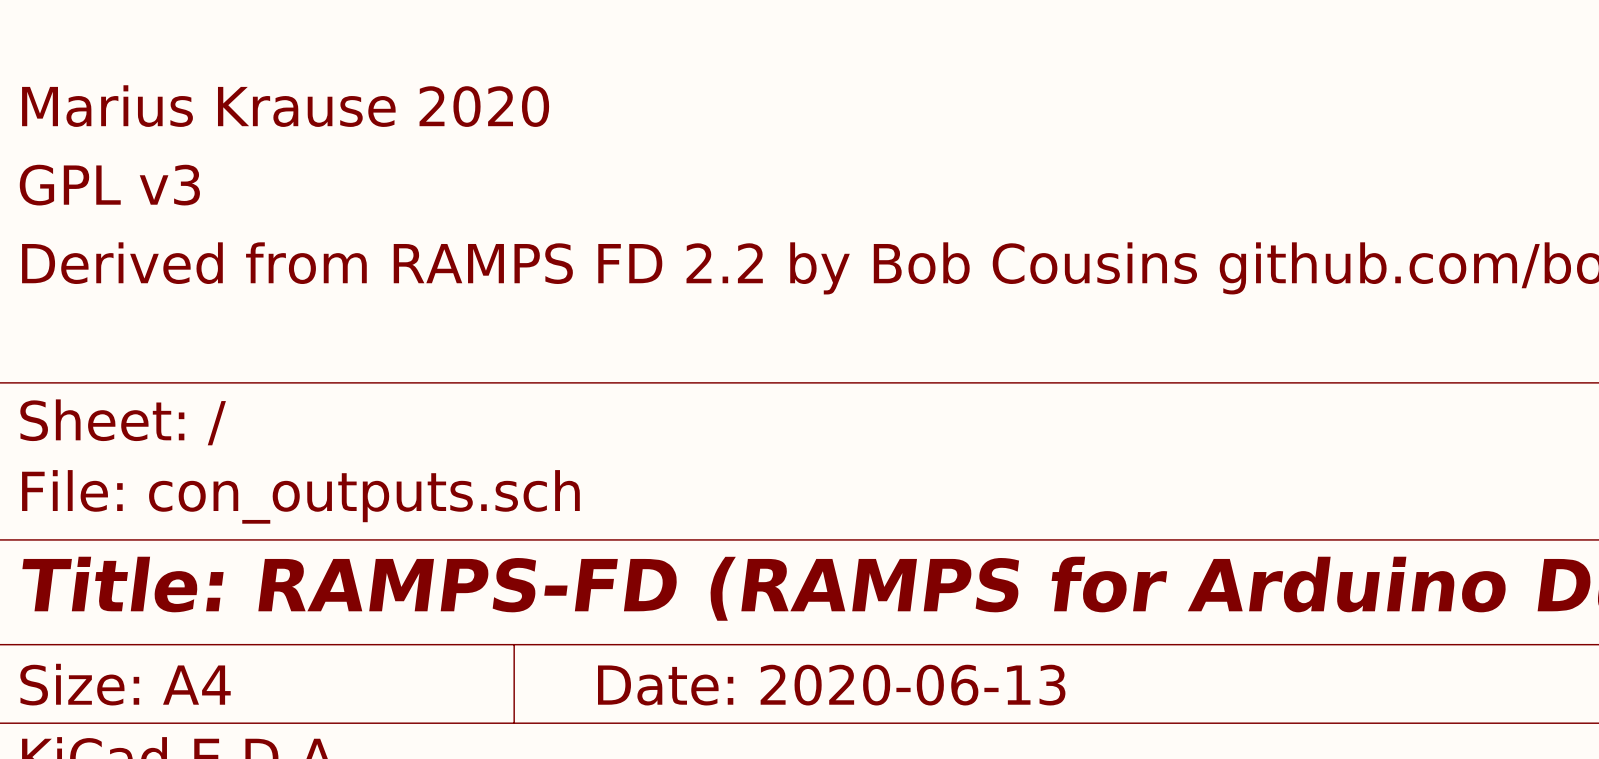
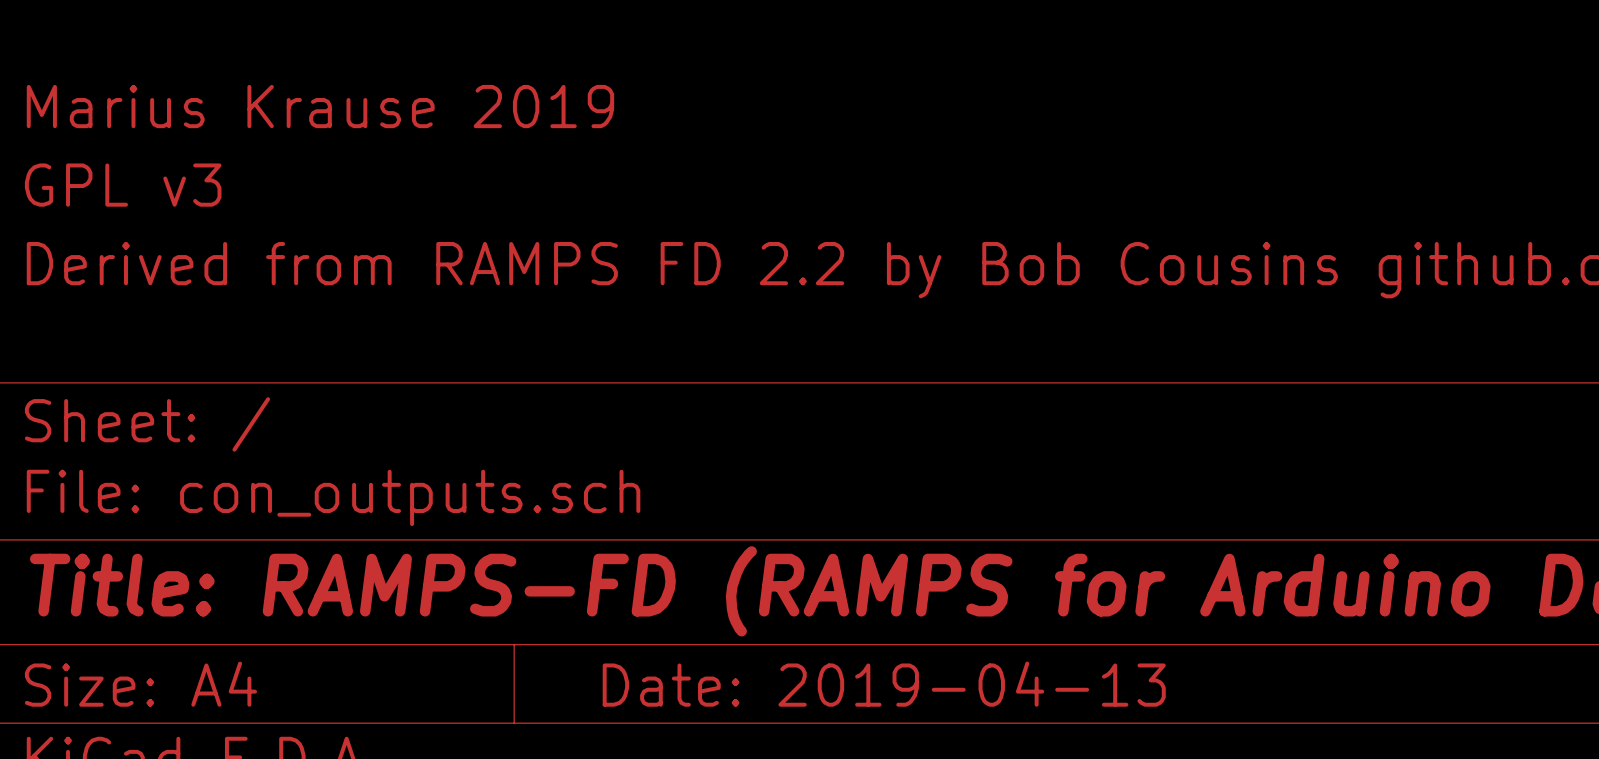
title block: Marius Krause 2020 (285, 106) -> Marius Krause 2019 (320, 106)
title block: Date: 2020-06-13 (831, 685) -> Date: 2019-04-13 (884, 684)

